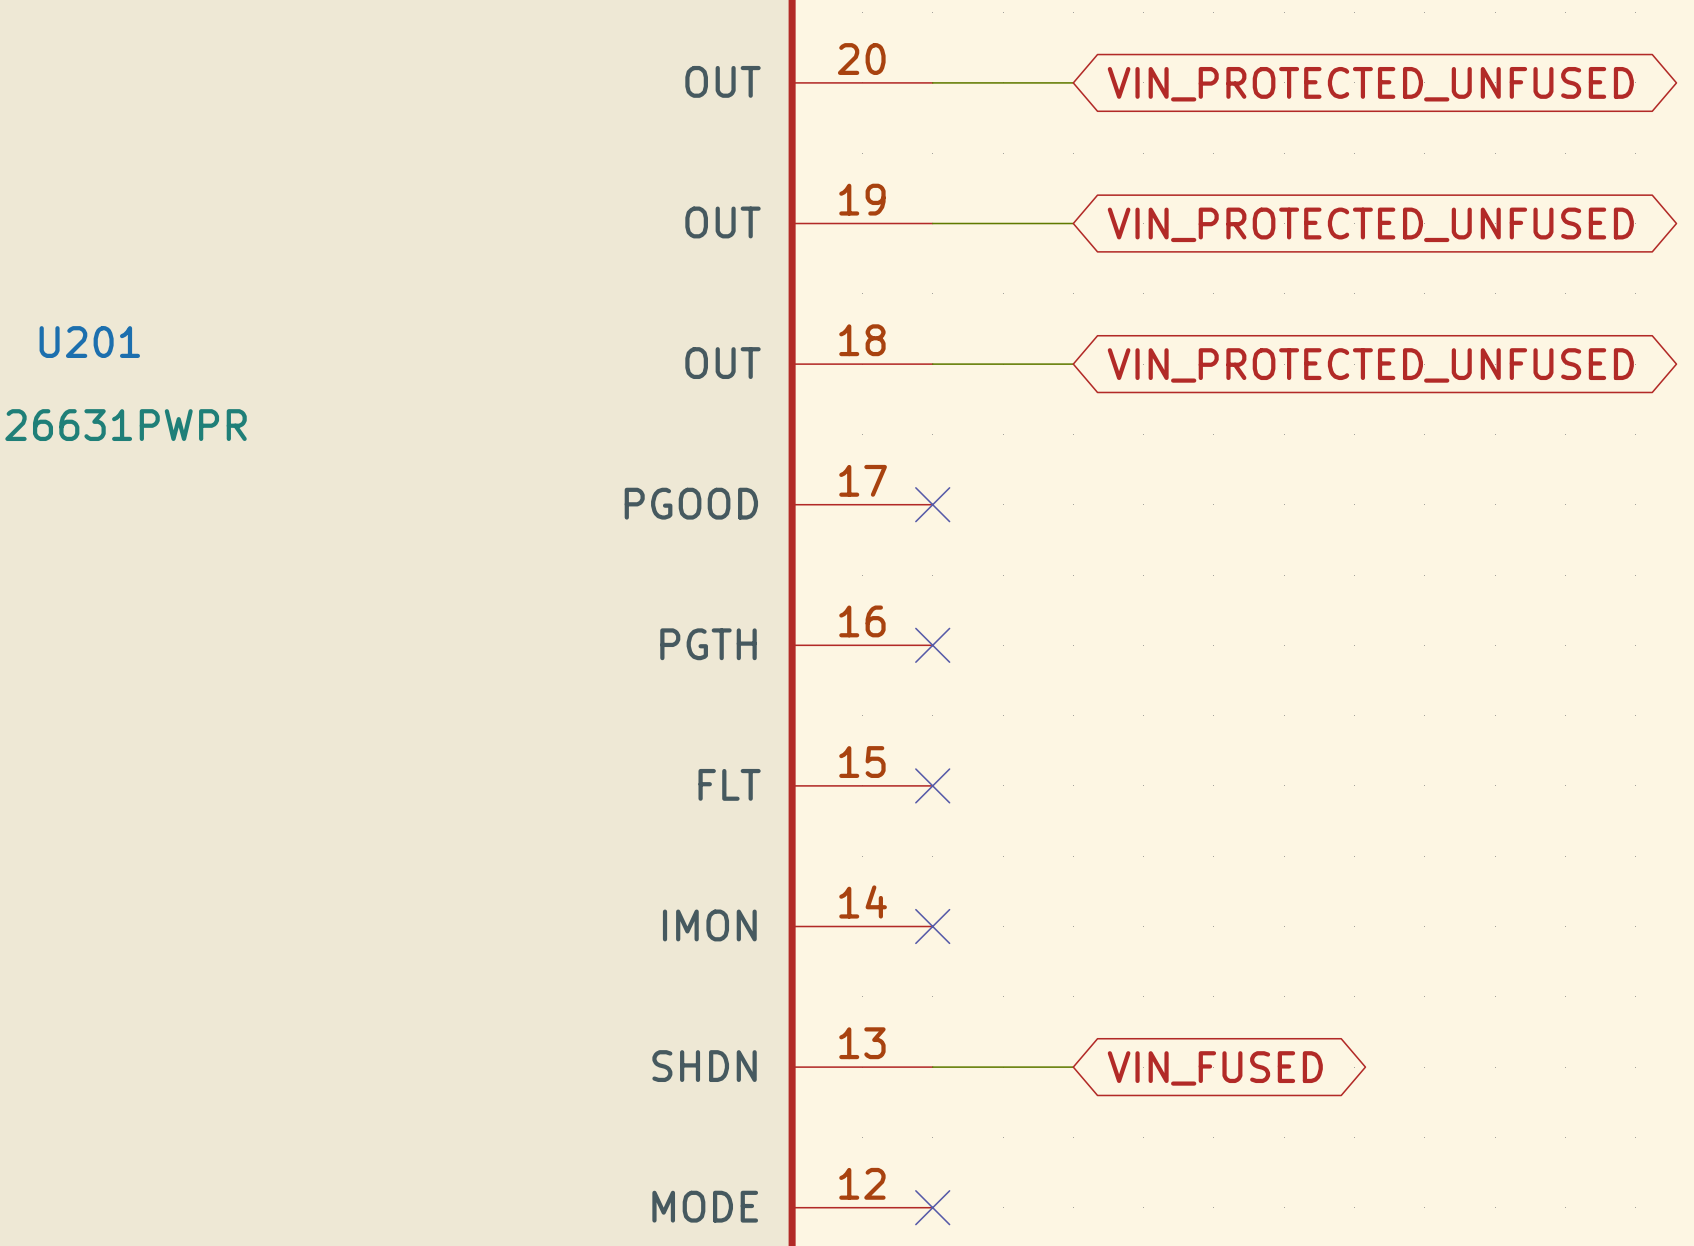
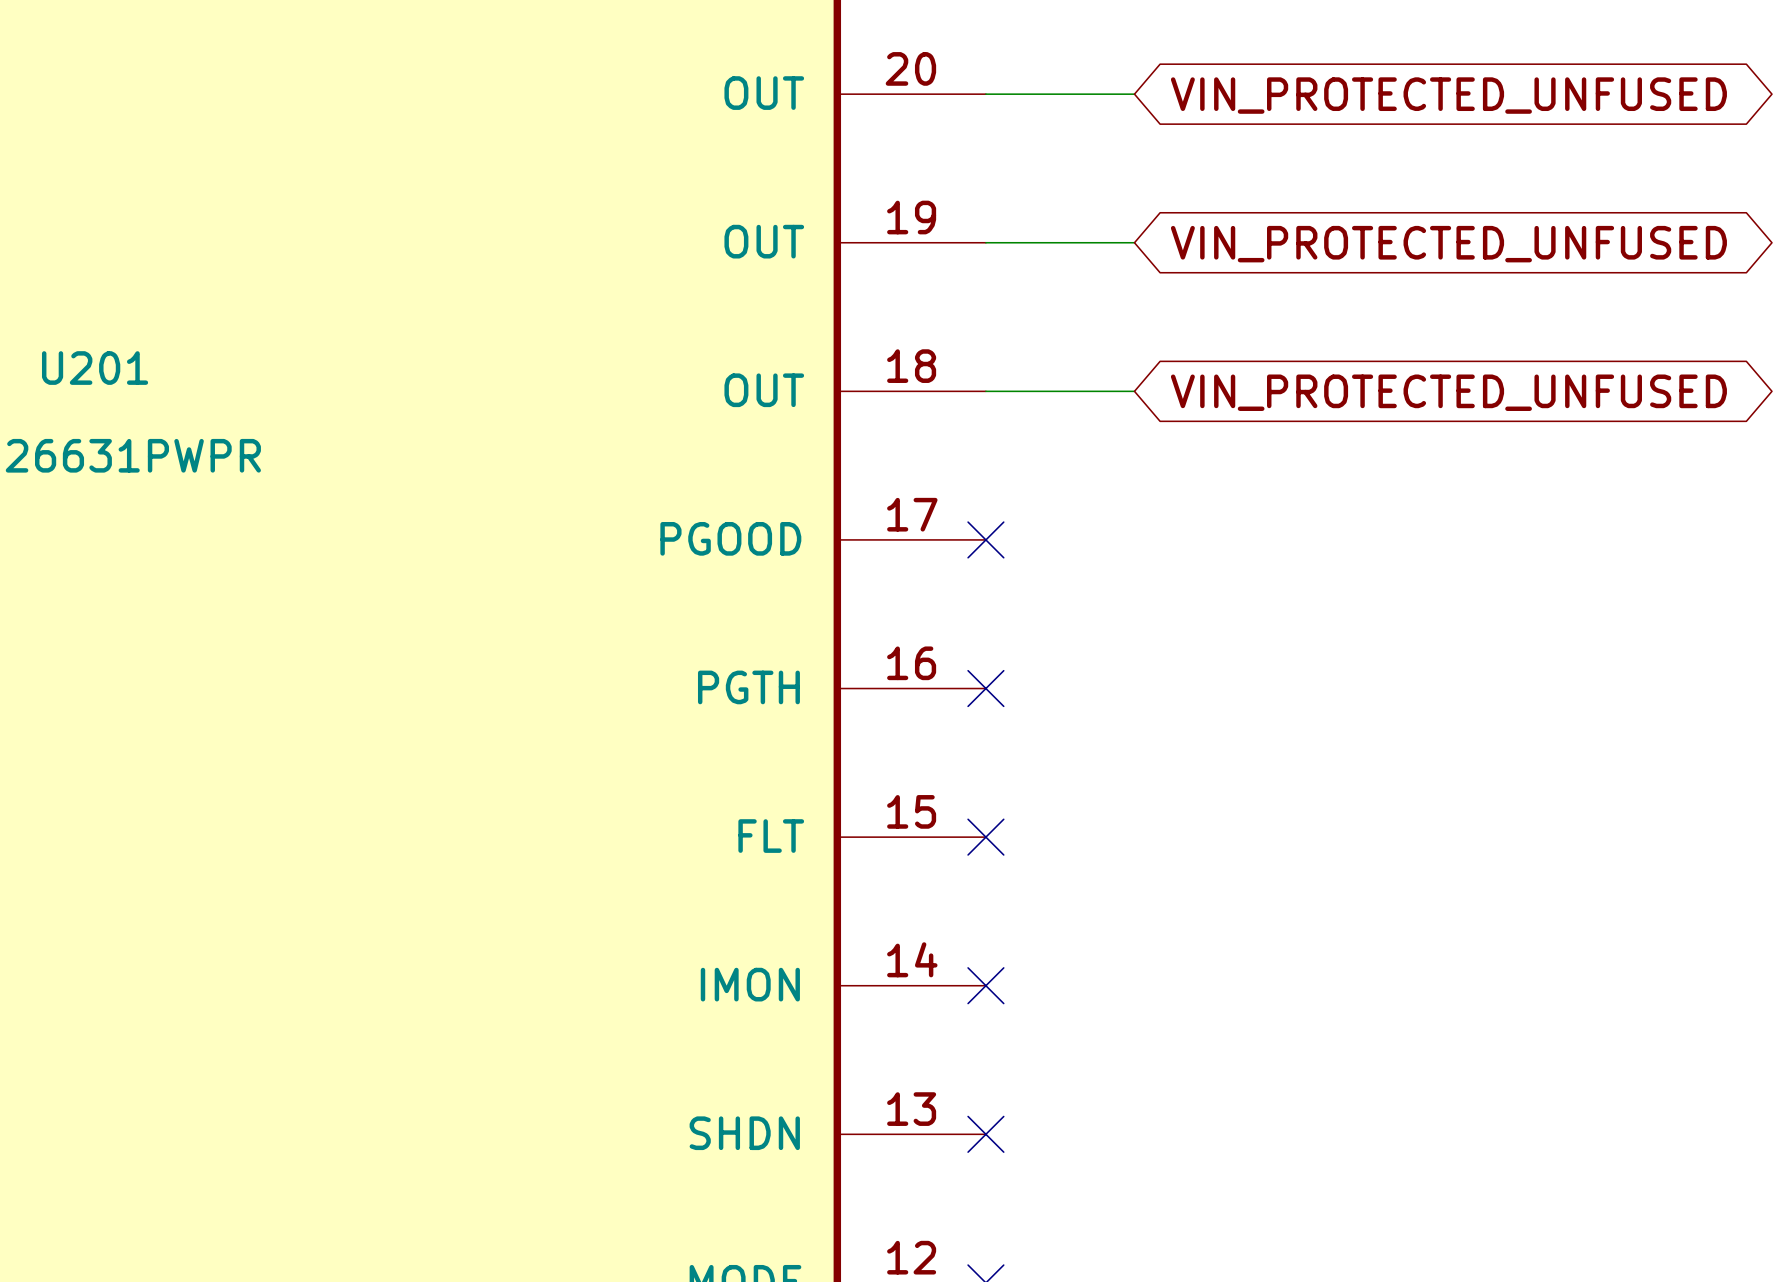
wire: (932, 1067) (1073, 1067) -> none
no-connect mark: none -> (985, 1134)
global label: VIN_FUSED (1215, 1068) -> none

